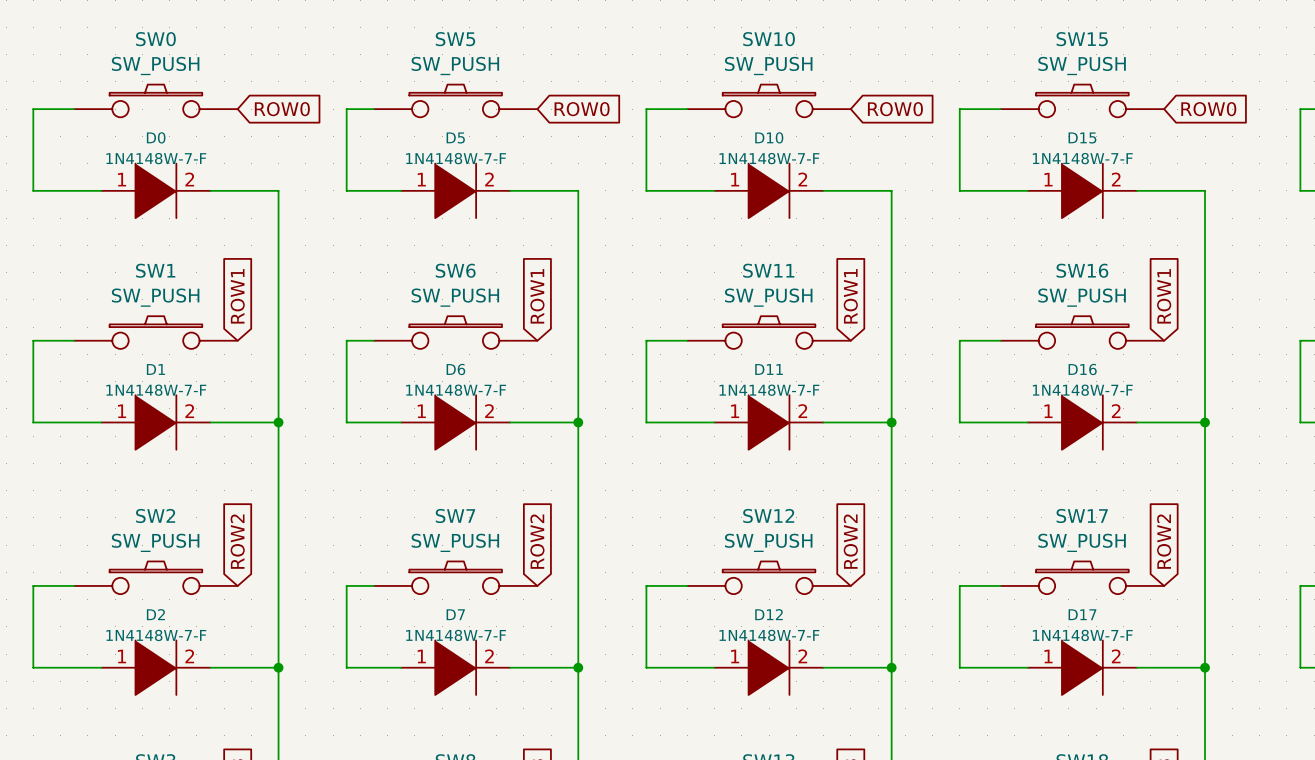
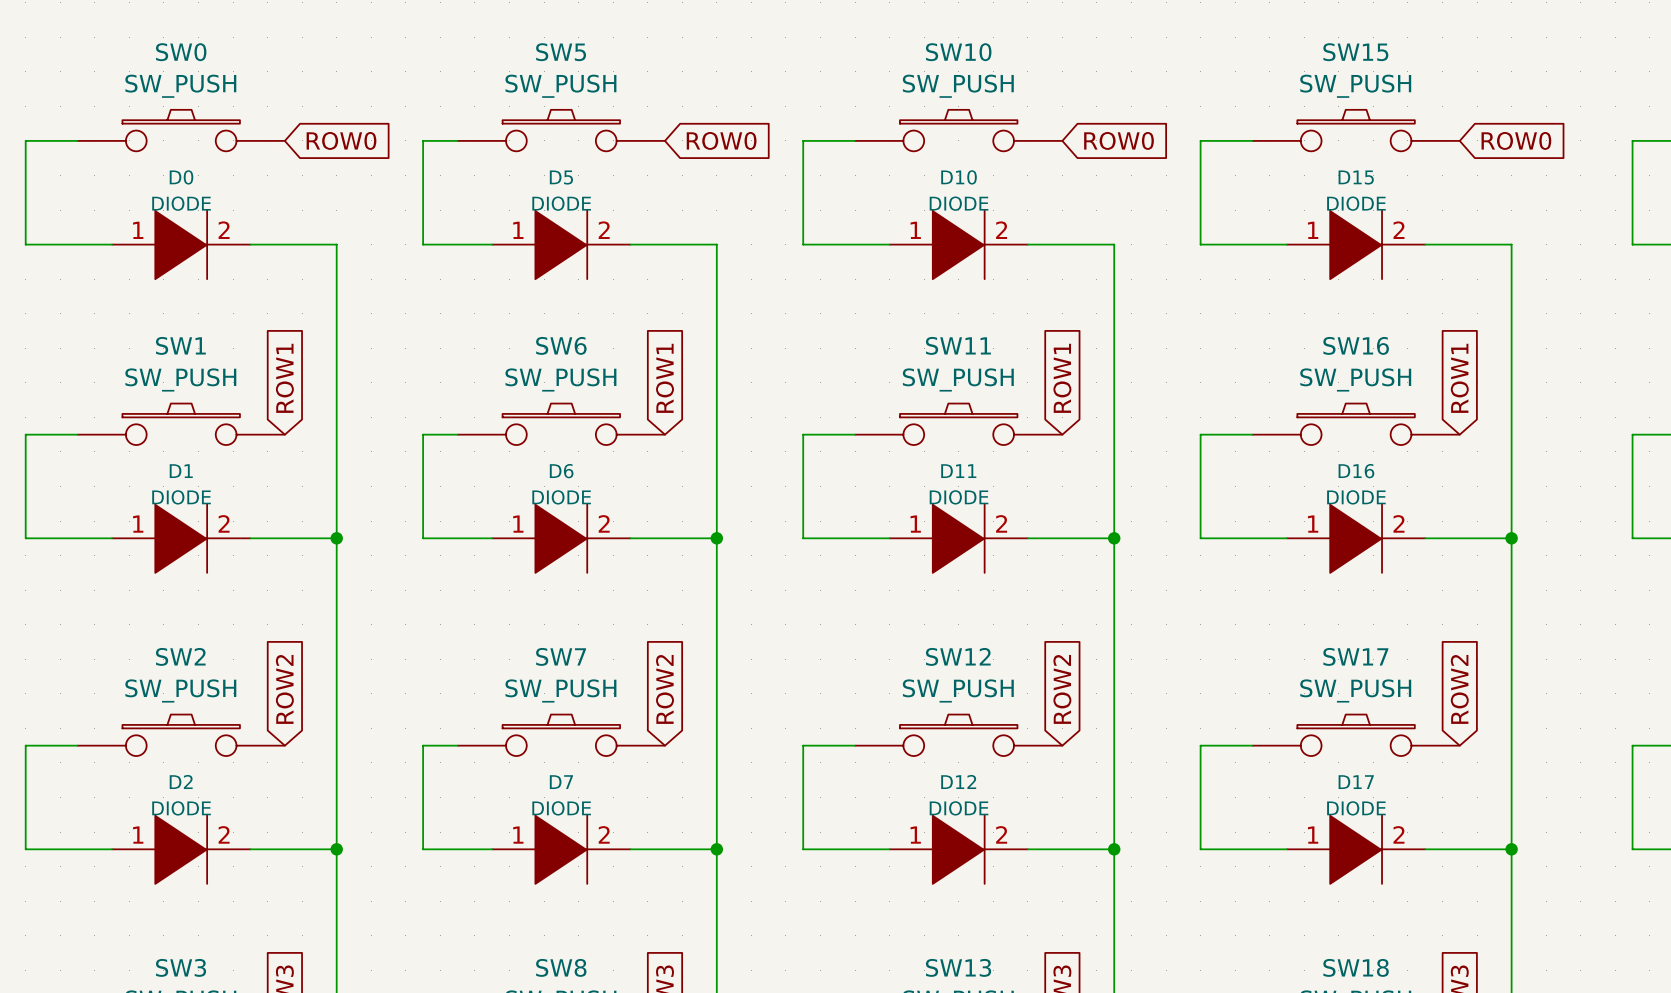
D0 value: 1N4148W-7-F (156, 158) -> DIODE (181, 203)
D5 value: 1N4148W-7-F (456, 158) -> DIODE (561, 203)
D10 value: 1N4148W-7-F (769, 158) -> DIODE (959, 203)
D15 value: 1N4148W-7-F (1082, 158) -> DIODE (1356, 203)
D1 value: 1N4148W-7-F (156, 390) -> DIODE (181, 497)
D6 value: 1N4148W-7-F (456, 390) -> DIODE (561, 497)
D11 value: 1N4148W-7-F (769, 390) -> DIODE (959, 497)
D16 value: 1N4148W-7-F (1082, 390) -> DIODE (1356, 497)
D2 value: 1N4148W-7-F (156, 635) -> DIODE (181, 808)
D7 value: 1N4148W-7-F (456, 635) -> DIODE (561, 808)
D12 value: 1N4148W-7-F (769, 635) -> DIODE (959, 808)
D17 value: 1N4148W-7-F (1082, 635) -> DIODE (1356, 808)

